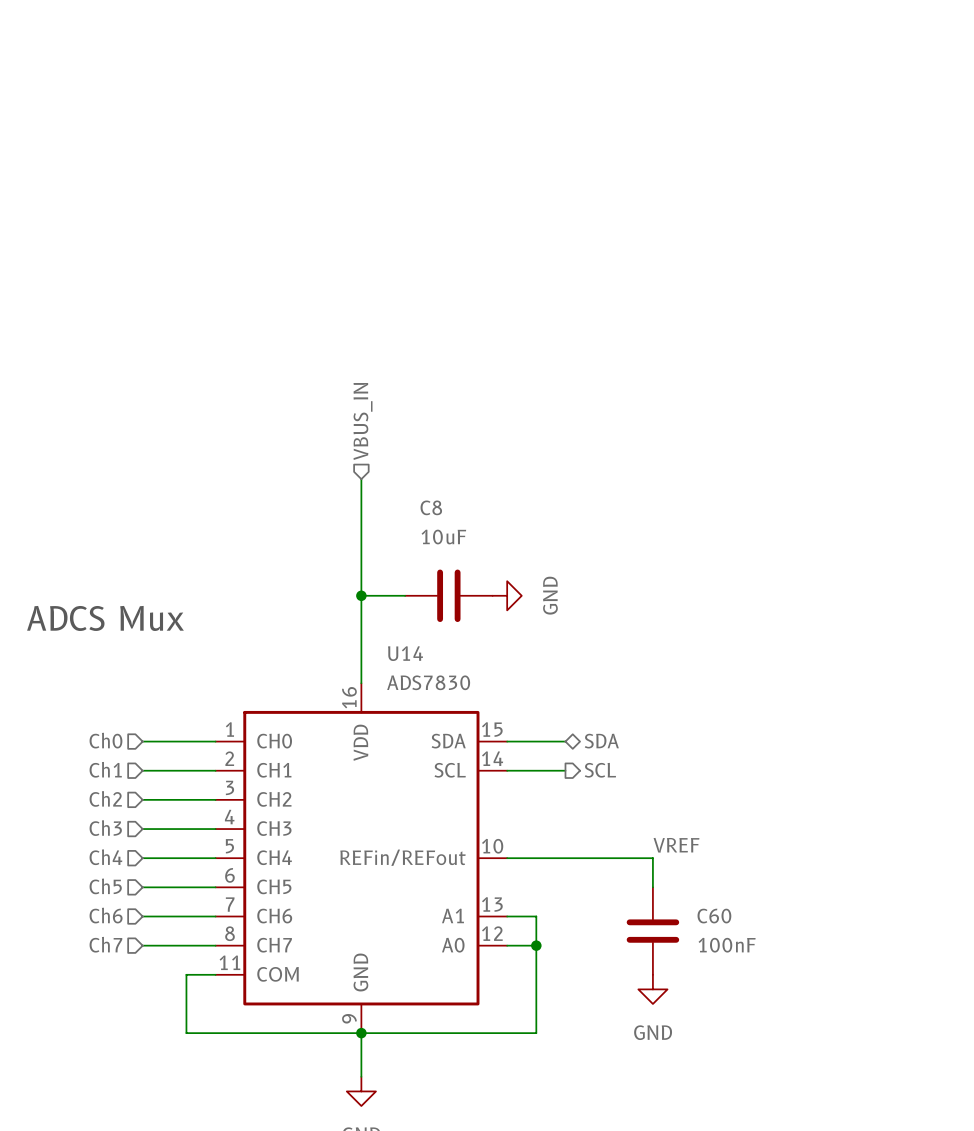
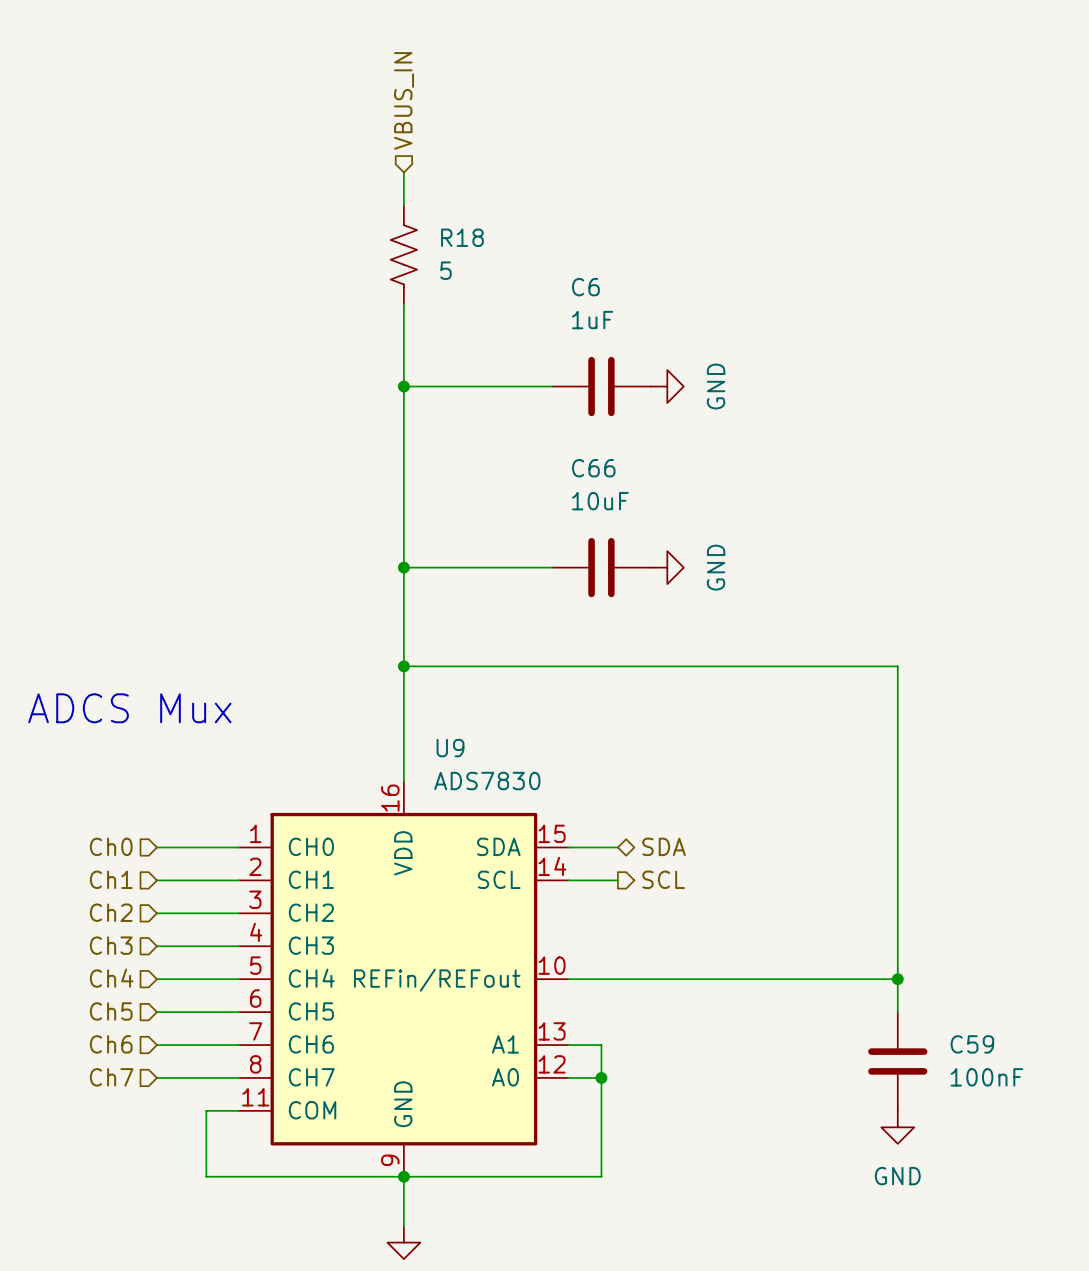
hierarchical label: none -> VBUS_IN (404, 100)
wire: none -> (403, 172) (403, 205)
R18: none -> 5 (403, 254)
wire: none -> (403, 304) (403, 551)
wire: none -> (403, 386) (552, 386)
junction: none -> (403, 386)
C6: none -> 1uF (601, 386)
power symbol: none -> GND (667, 386)
hierarchical label: VBUS_IN (363, 421) -> none
wire: none -> (403, 567) (552, 567)
junction: none -> (403, 567)
C66: none -> 10uF (601, 567)
wire: none -> (403, 666) (897, 666) (897, 1012)
wire: (361, 595) (405, 595) -> none
junction position: (361, 595) -> (403, 666)
C8: 10uF (448, 595) -> none
power symbol position: GND (507, 595) -> GND (667, 567)
U14 name: U14 (405, 653) -> U9 (450, 748)
wire: (550, 741) (565, 741) -> none
hierarchical label position: SDA (601, 741) -> SDA (664, 846)
wire: (550, 770) (565, 770) -> none
hierarchical label position: SCL (600, 770) -> SCL (663, 879)
label: VREF (676, 845) -> none
wire: (652, 858) (652, 887) -> (733, 979) (897, 979)
junction: none -> (897, 979)
C60: 100nF (652, 931) -> none
C59: none -> 100nF (897, 1061)
power symbol position: GND (652, 989) -> GND (897, 1127)

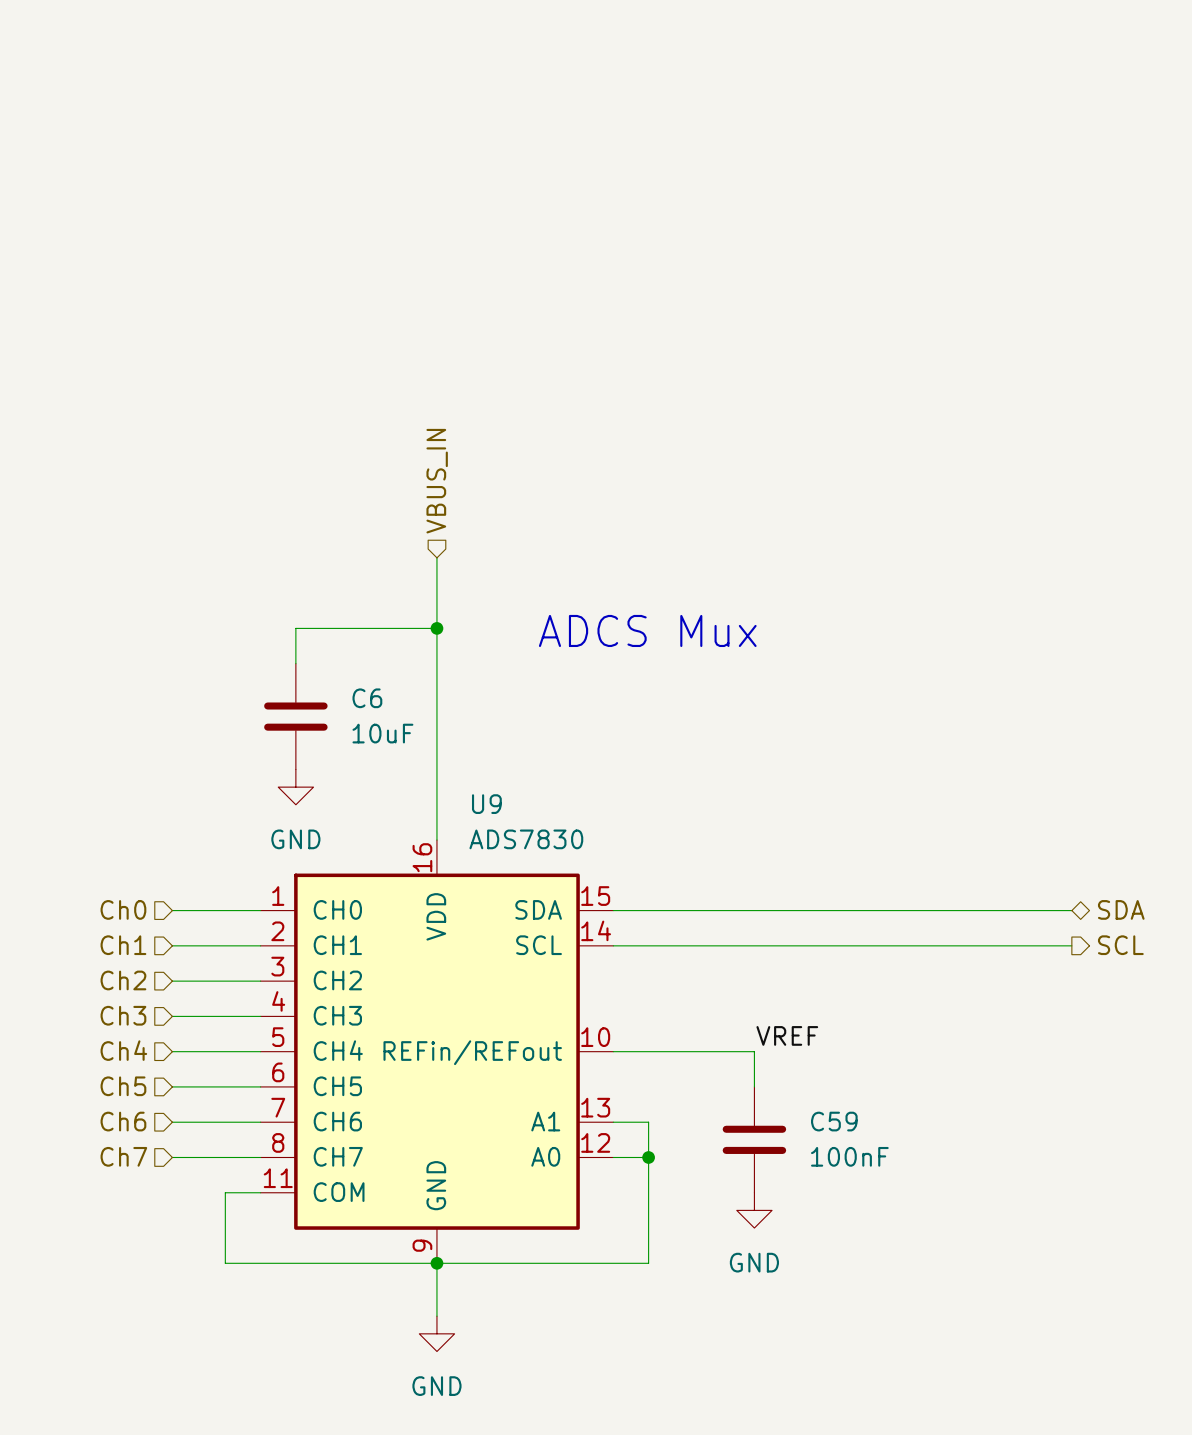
hierarchical label: VBUS_IN (404, 100) -> none
wire: (403, 172) (403, 205) -> none
R18: 5 (403, 254) -> none
C6 name position: C6 (585, 287) -> C6 (367, 698)
wire: (403, 304) (403, 518) -> none
C6 value: 1uF (592, 320) -> 10uF (382, 733)
wire: (403, 386) (552, 386) -> none
junction: (403, 386) -> none
C6 rotation: 0° (601, 386) -> 90° clockwise (295, 716)
C6 position: (601, 386) -> (295, 716)
power symbol: GND (667, 386) -> none
hierarchical label: none -> VBUS_IN (437, 481)
wire: (403, 567) (552, 567) -> none
junction position: (403, 567) -> (436, 628)
C66: 10uF (601, 567) -> none
power symbol: GND (667, 567) -> none
wire: none -> (436, 628) (295, 628) (295, 663)
text: none -> ADCS Mux (647, 630)
wire: (403, 666) (897, 666) (897, 1012) -> none
junction: (403, 666) -> none
text: ADCS Mux (129, 708) -> none
power symbol: none -> GND (295, 787)
hierarchical label: SDA (664, 846) -> none
hierarchical label: none -> SDA (1121, 909)
wire: none -> (666, 910) (1071, 910)
hierarchical label: SCL (663, 879) -> none
hierarchical label: none -> SCL (1120, 945)
wire: none -> (666, 945) (1071, 945)
label: none -> VREF (787, 1035)
wire: (700, 979) (897, 979) -> (754, 1051) (754, 1086)
junction: (897, 979) -> none
C59 position: (897, 1061) -> (754, 1139)
power symbol position: GND (897, 1127) -> GND (754, 1210)

